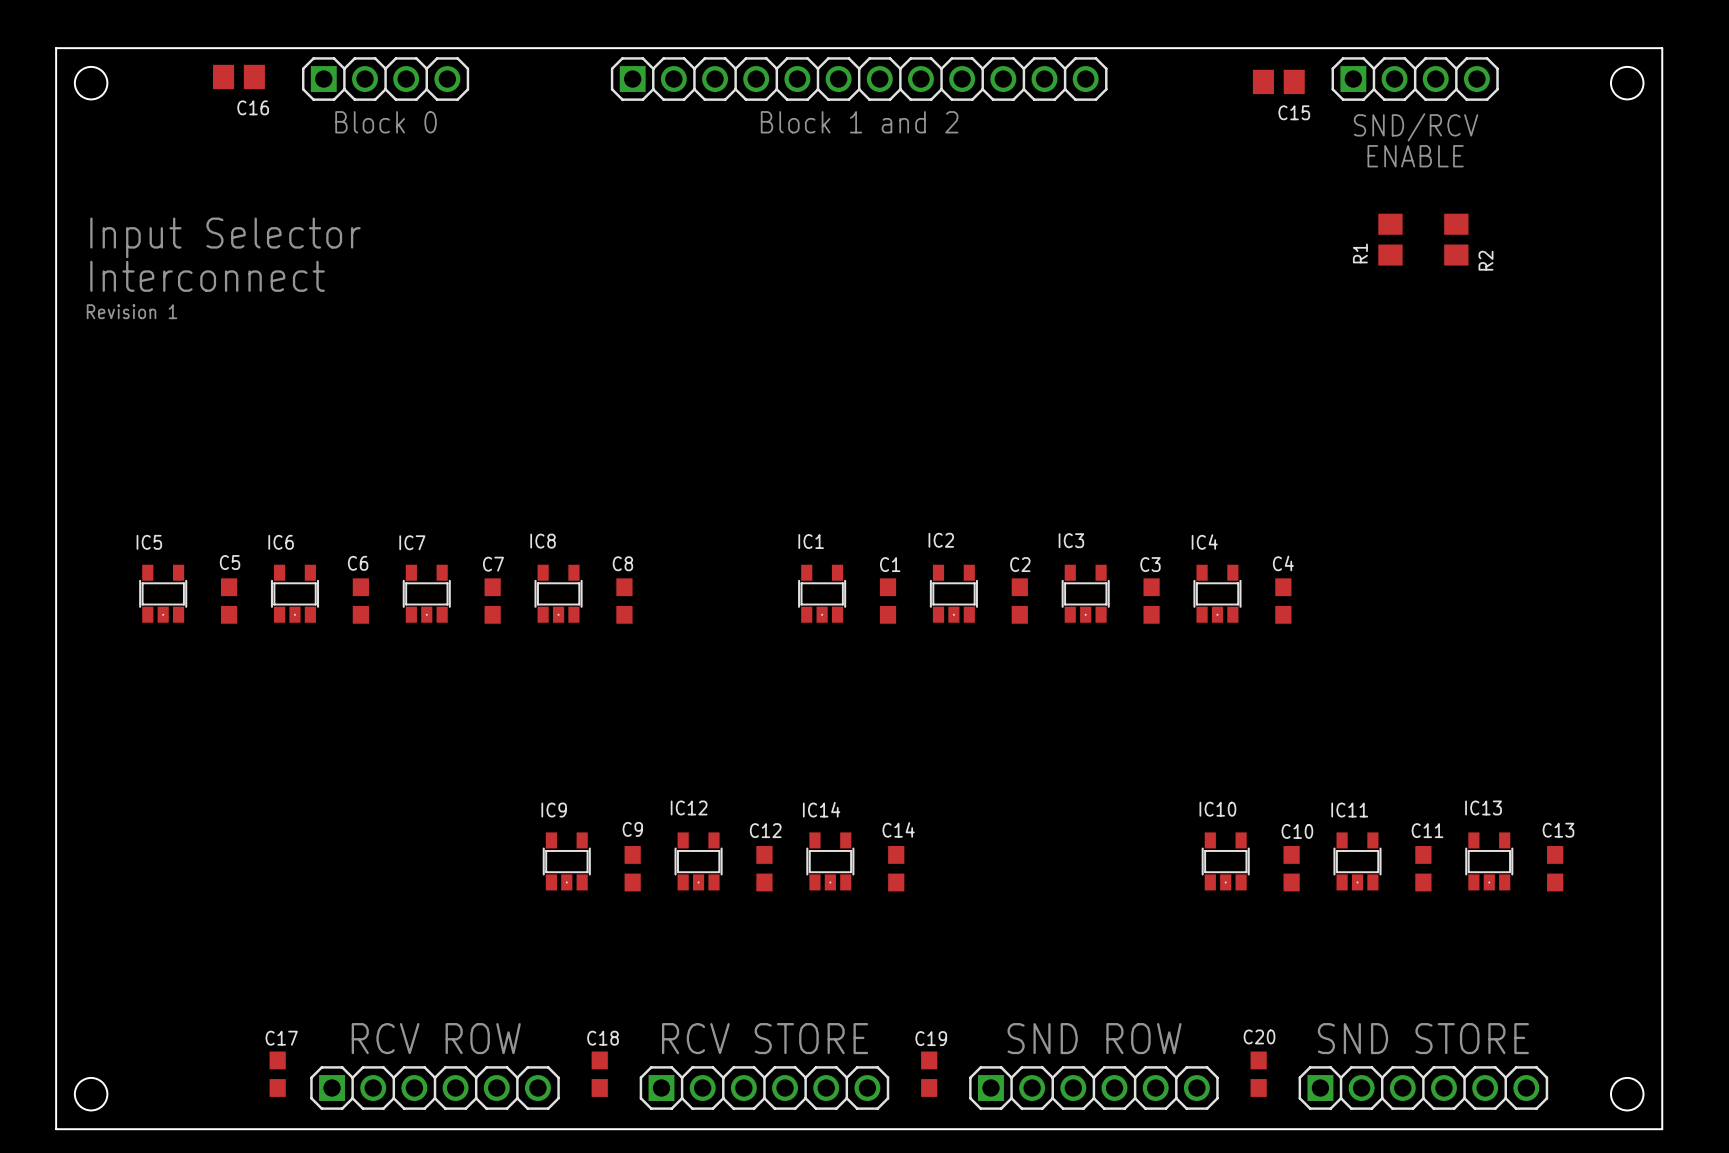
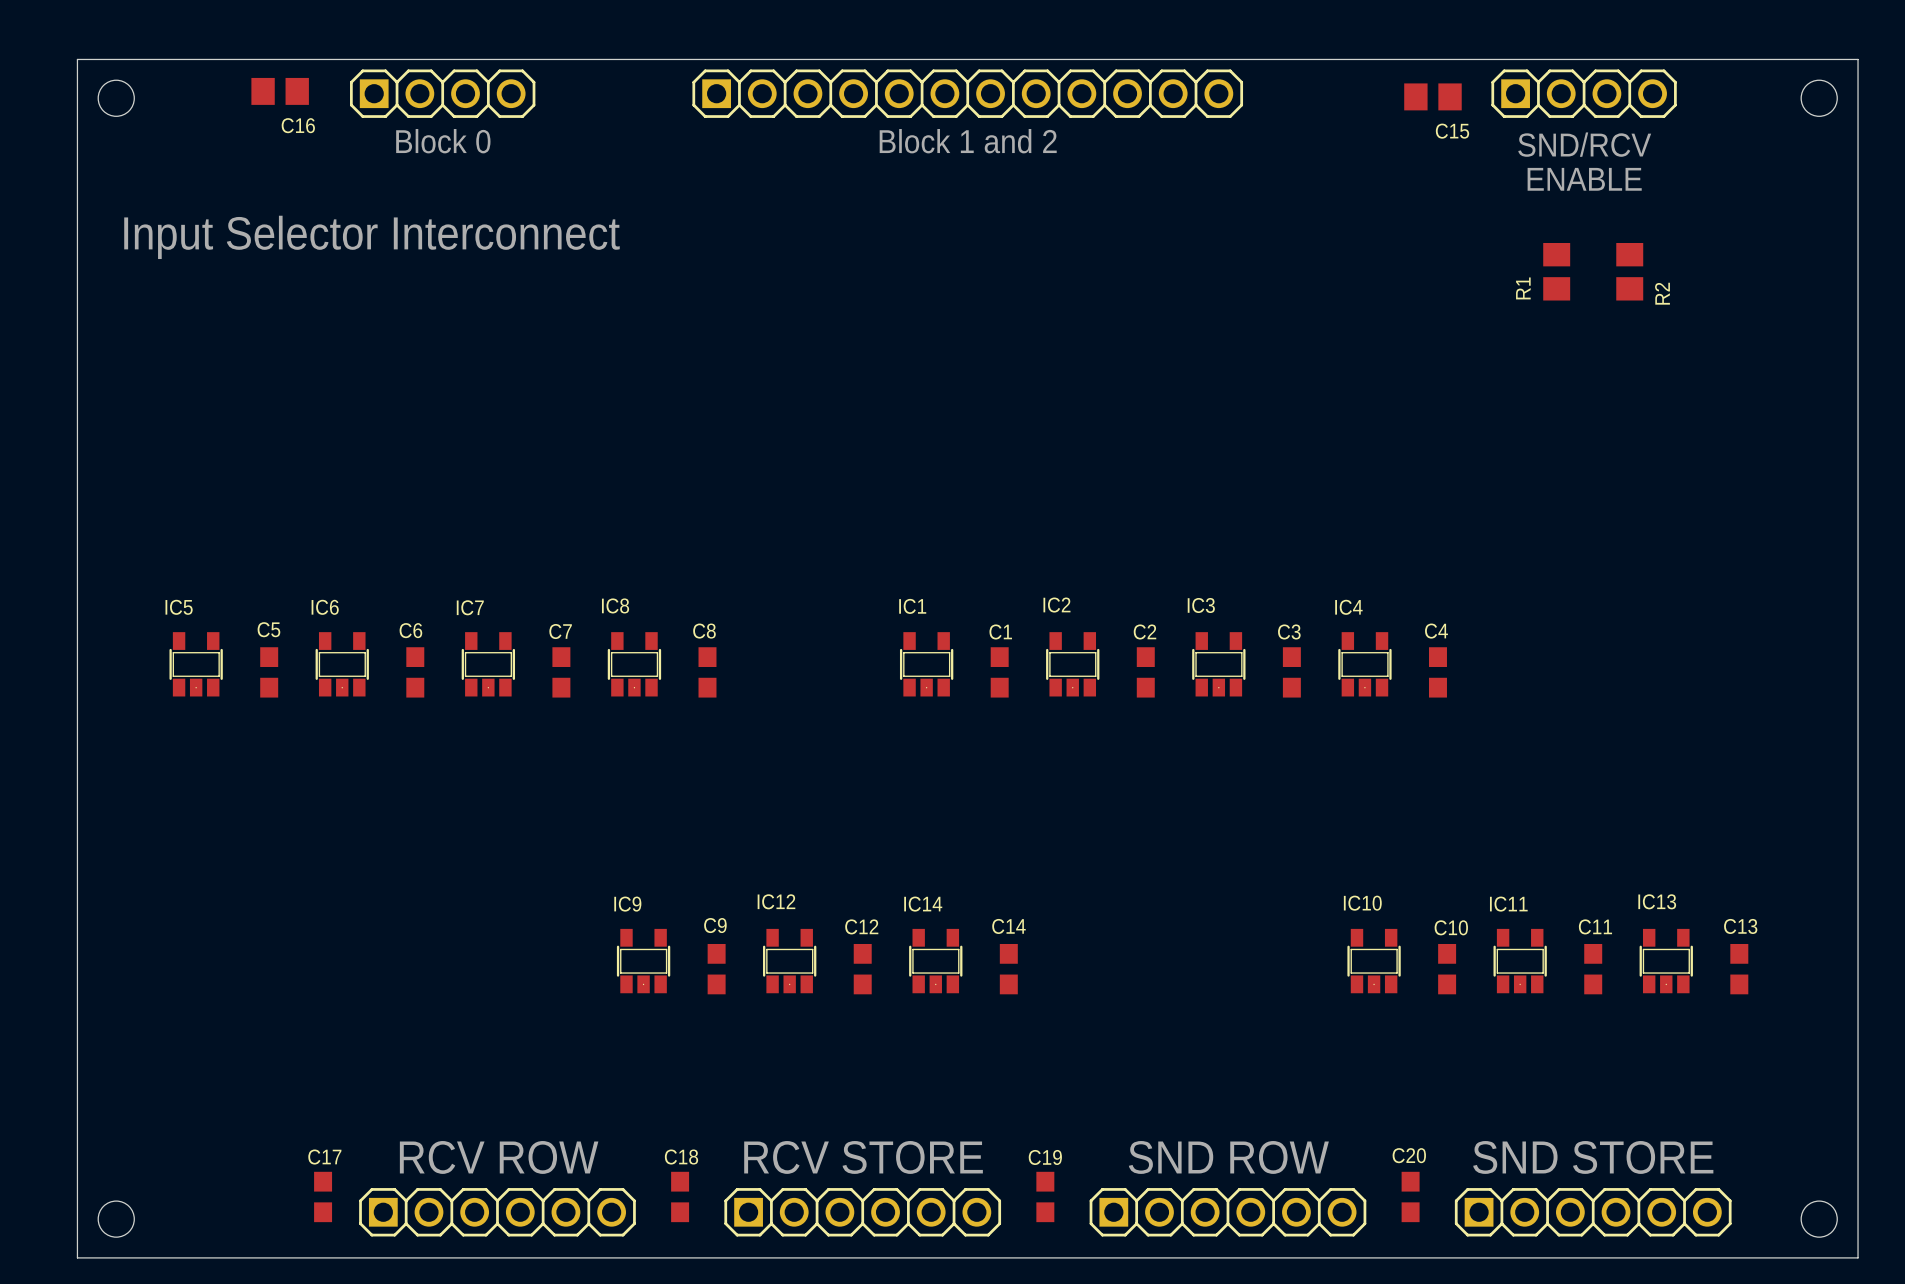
text: Input Selector (225, 237) -> Input Selector Interconnect (371, 237)
text: Interconnect (207, 276) -> none
text: Revision 1 (131, 311) -> none

